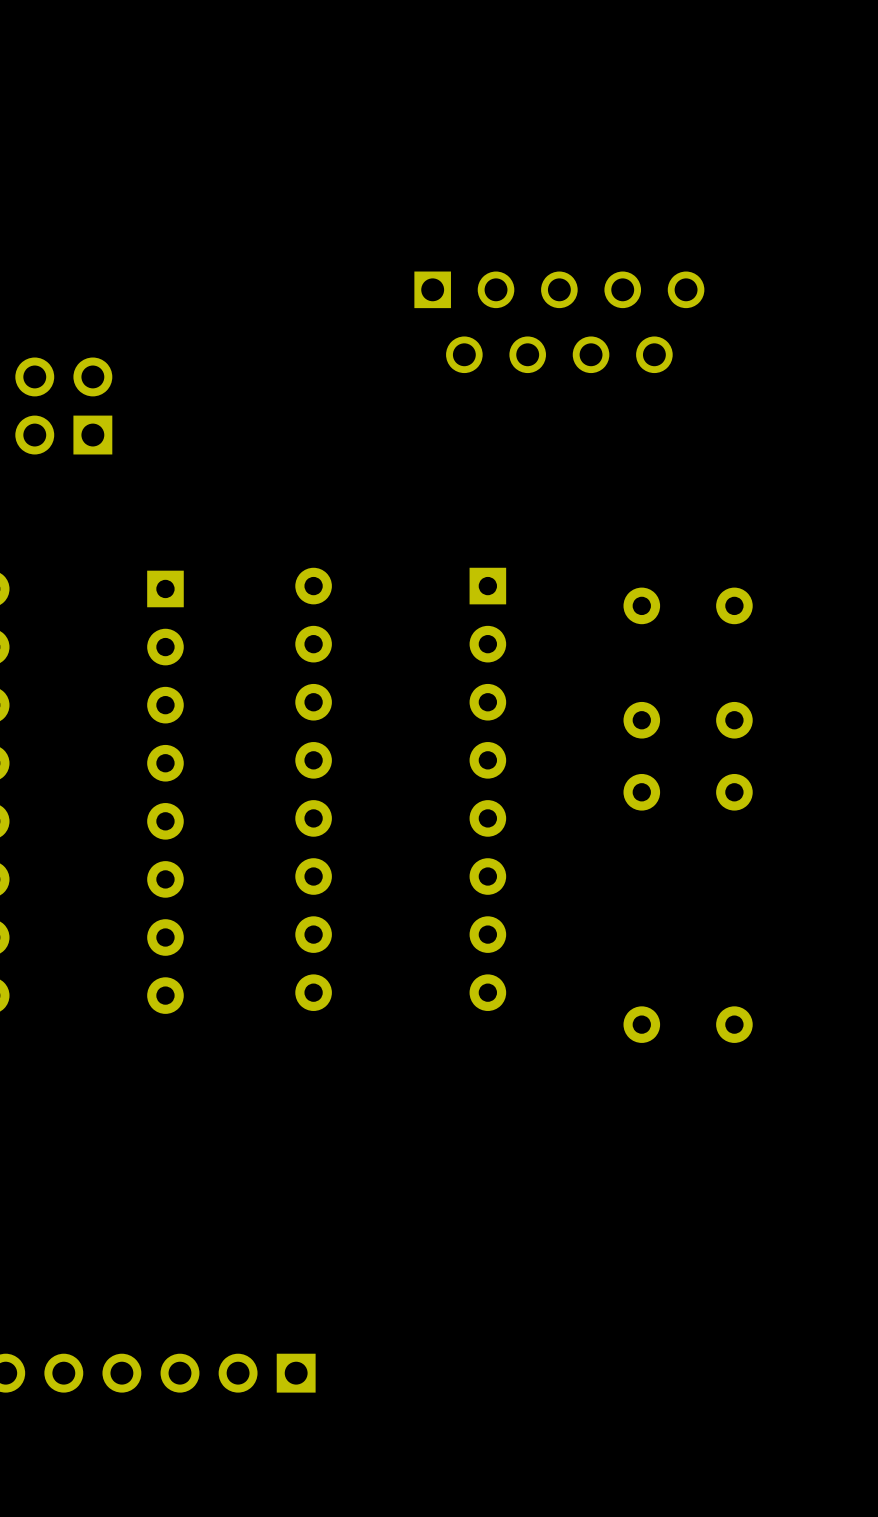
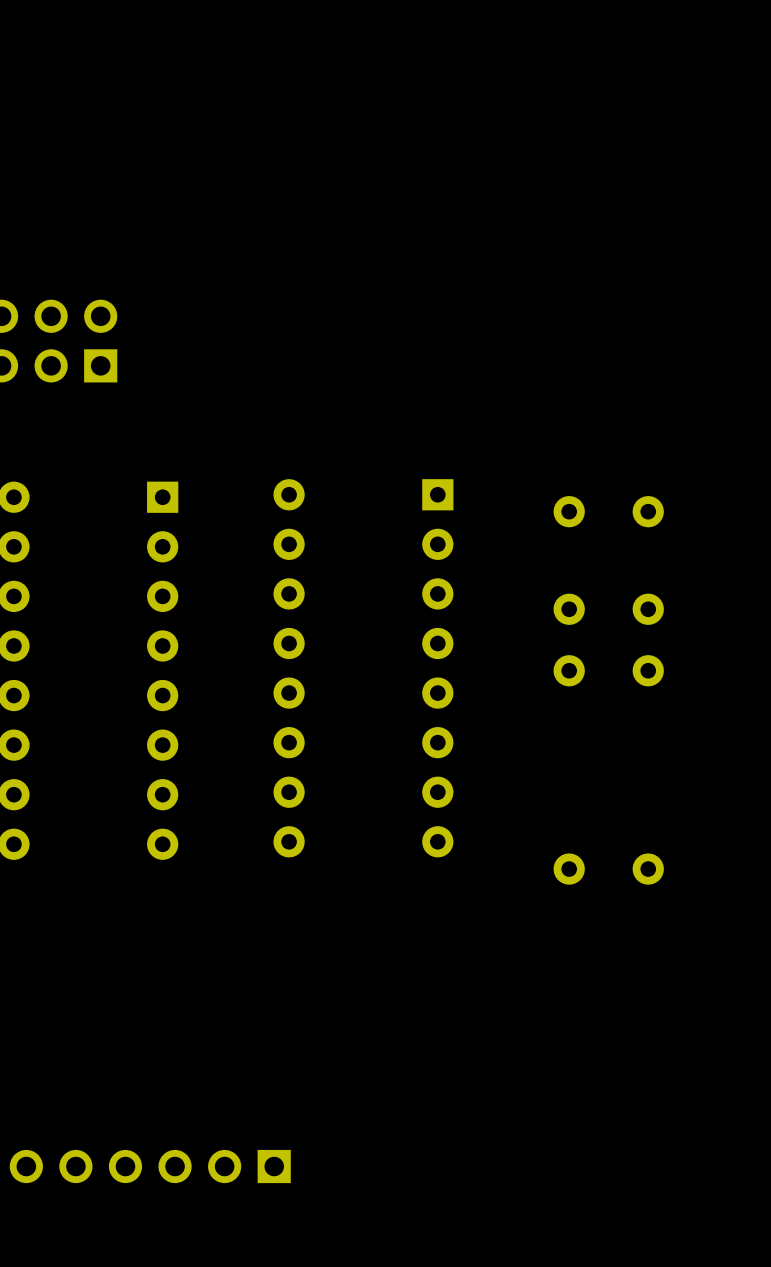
part: (559, 322) -> none

